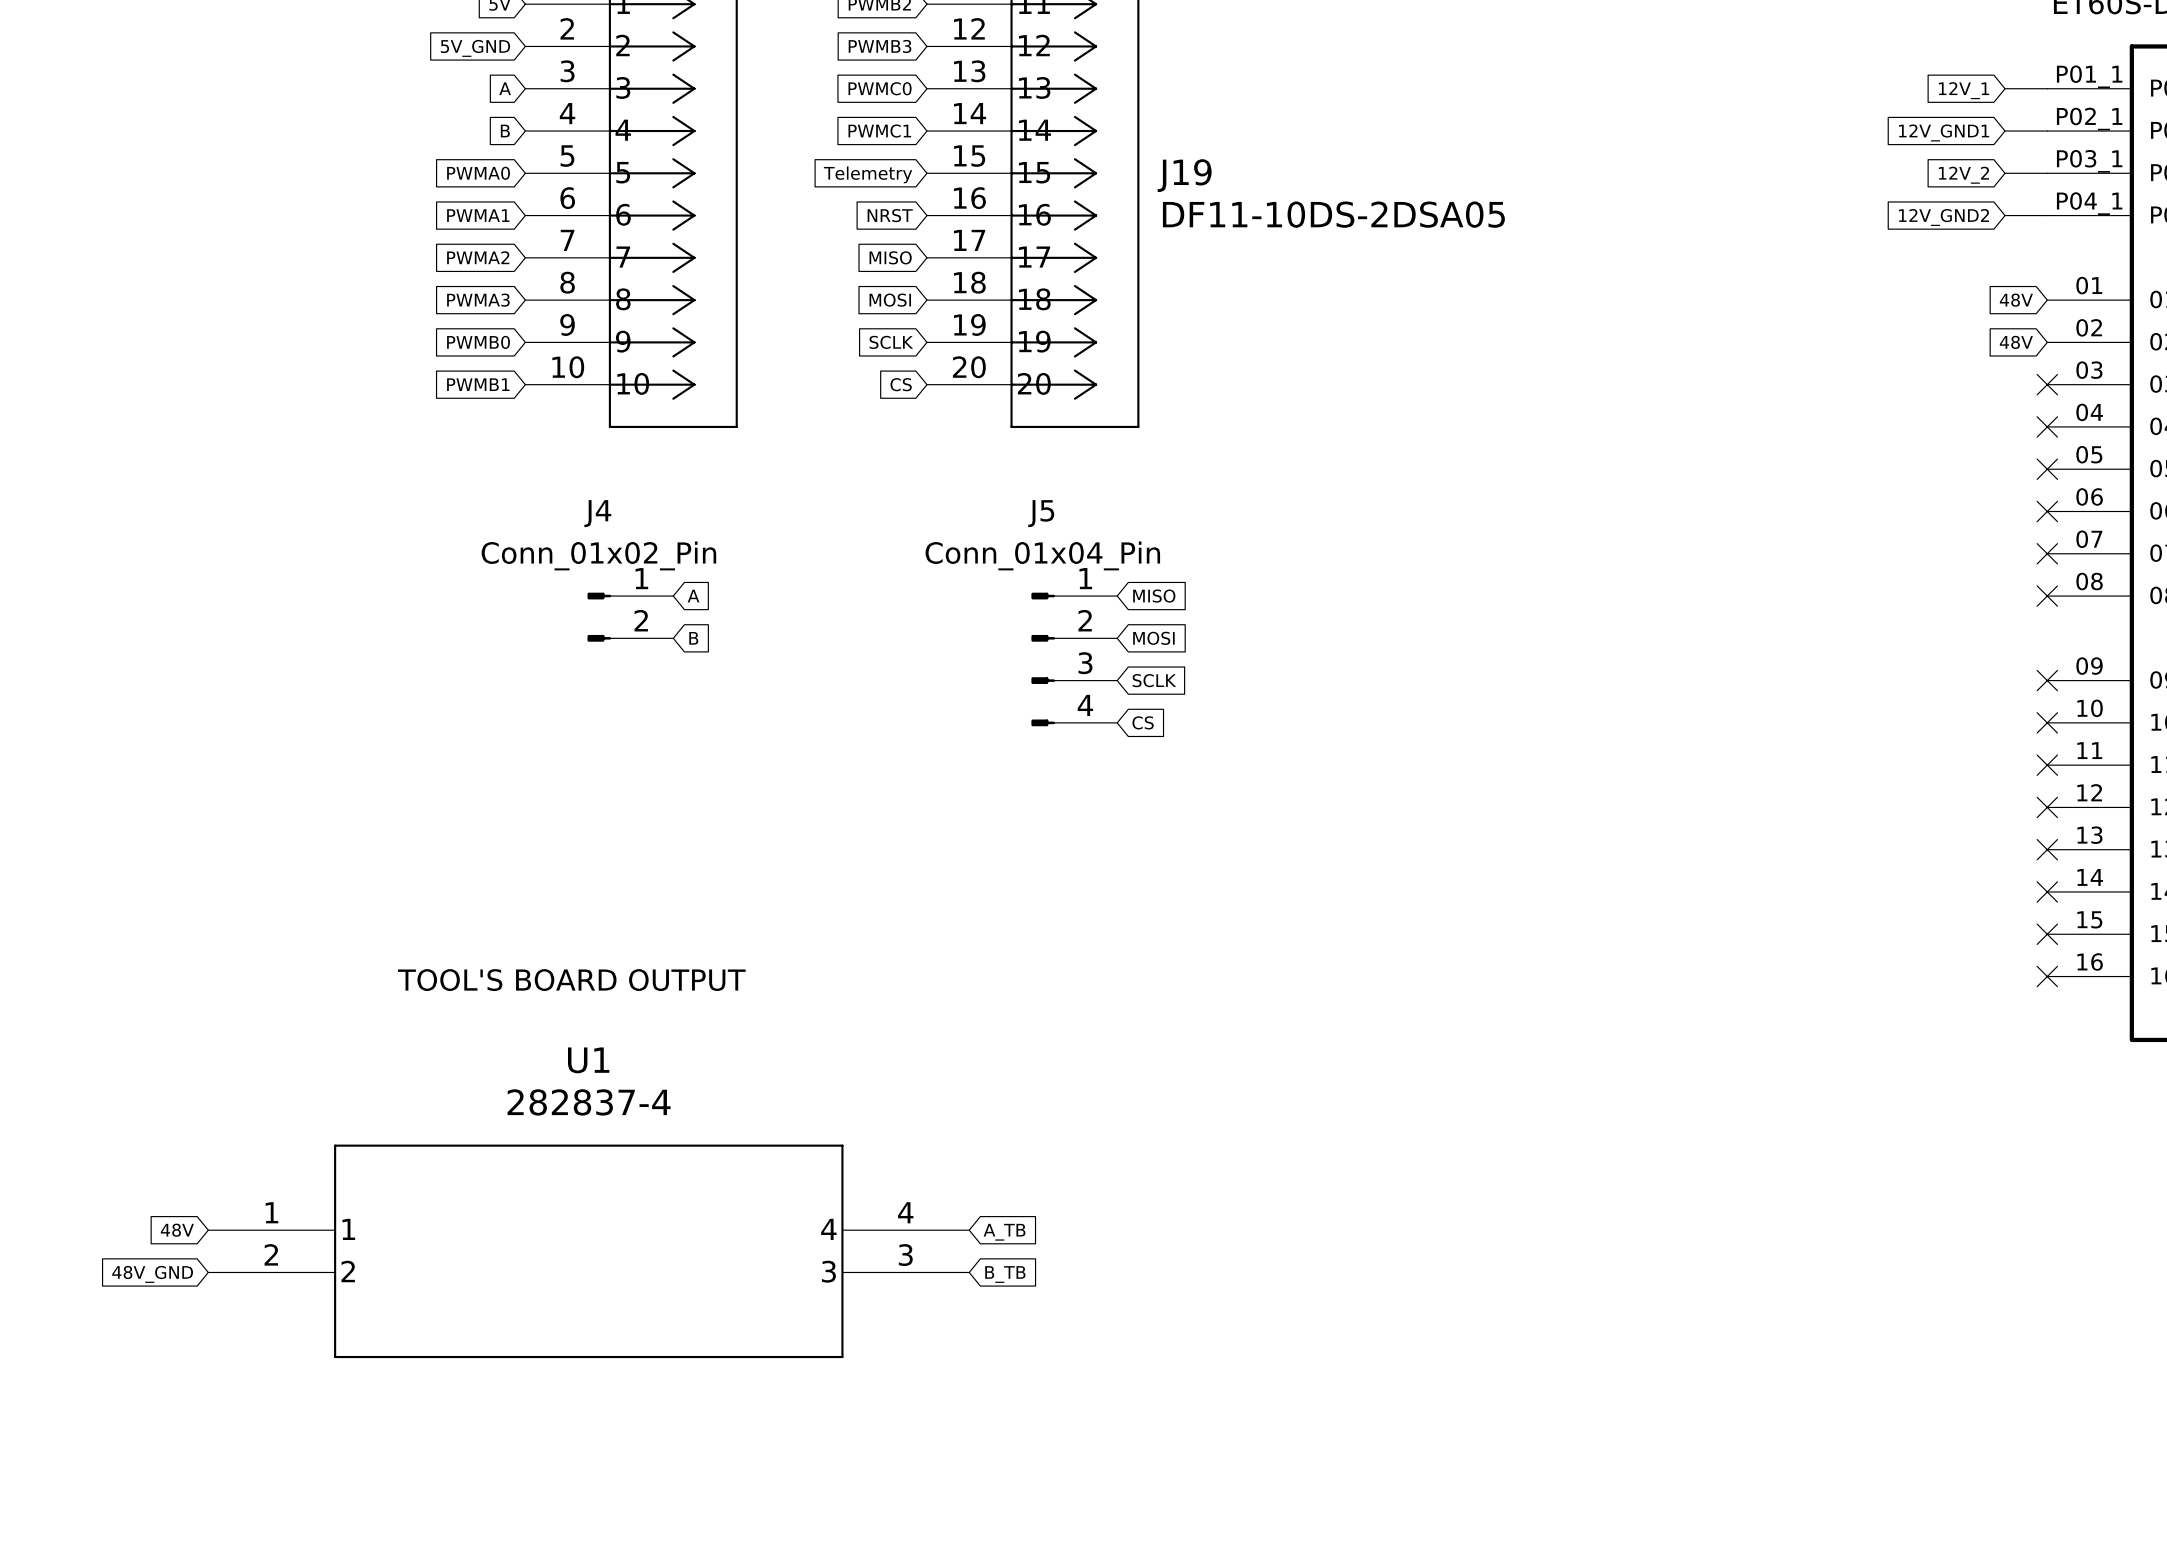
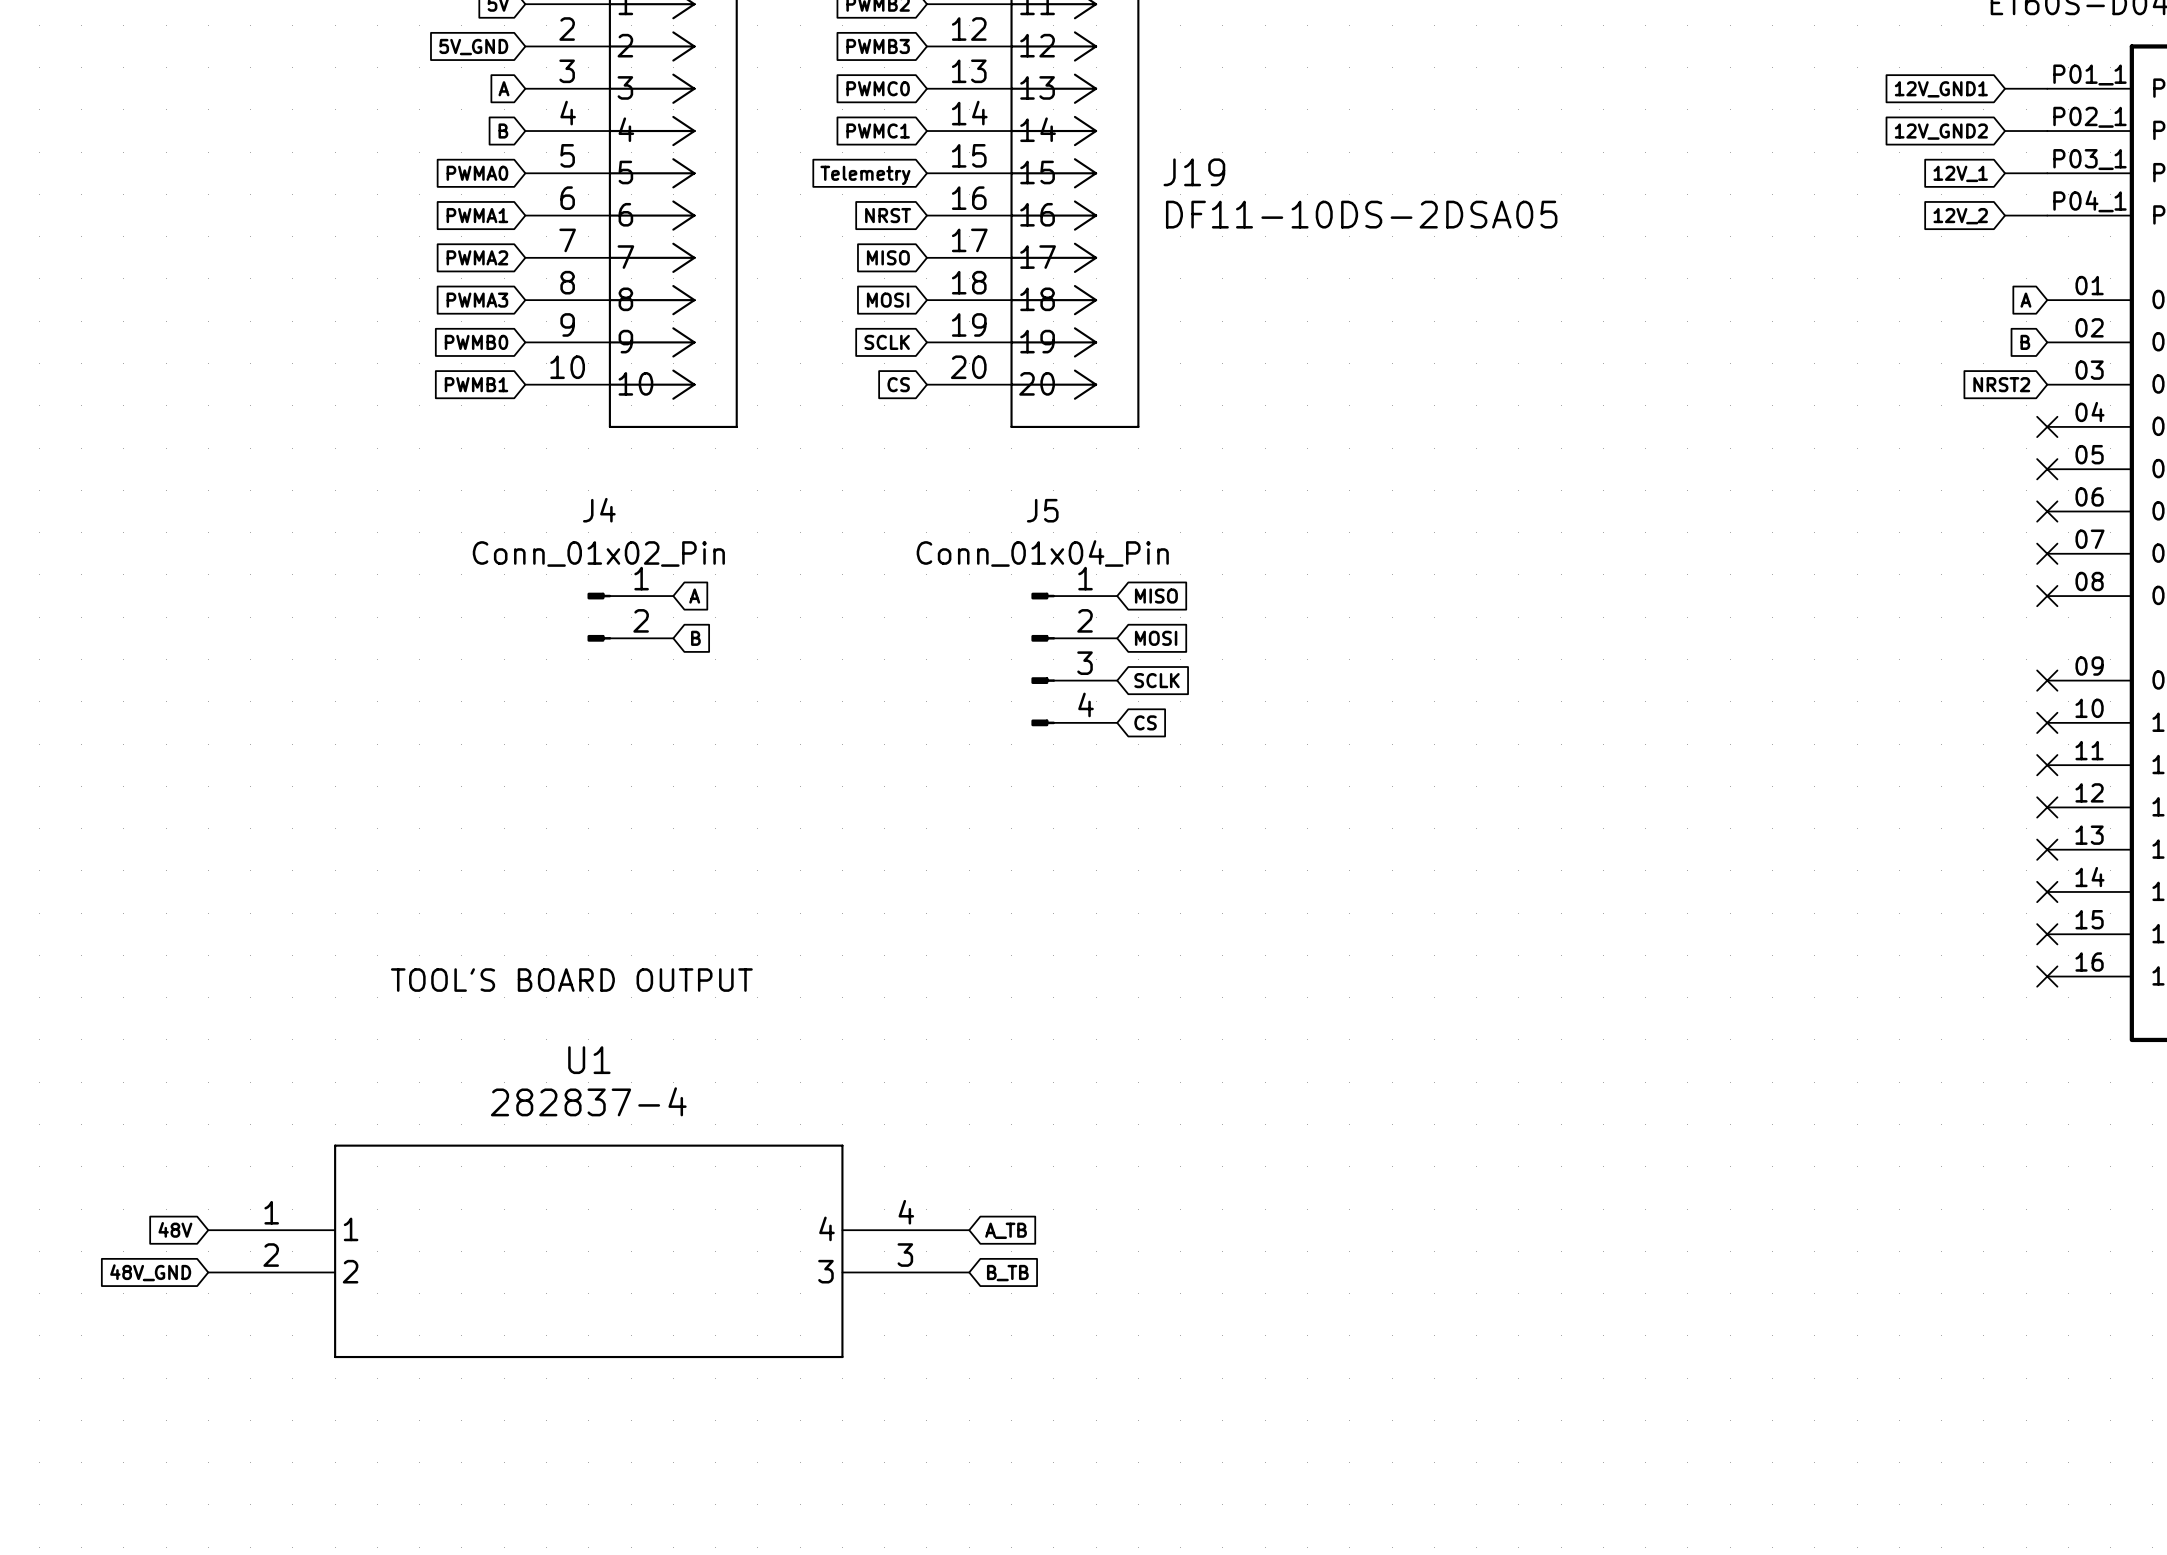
global label: 12V_1 (1964, 90) -> 12V_GND1 (1941, 89)
global label: 12V_GND1 (1944, 132) -> 12V_GND2 (1941, 131)
global label: 12V_2 (1963, 175) -> 12V_1 (1960, 173)
global label: 12V_GND2 (1943, 217) -> 12V_2 (1960, 216)
global label: 48V (2016, 300) -> A (2025, 300)
global label: 48V (2016, 342) -> B (2025, 342)
global label: none -> NRST2 (2001, 384)
no-connect mark: (2047, 384) -> none

